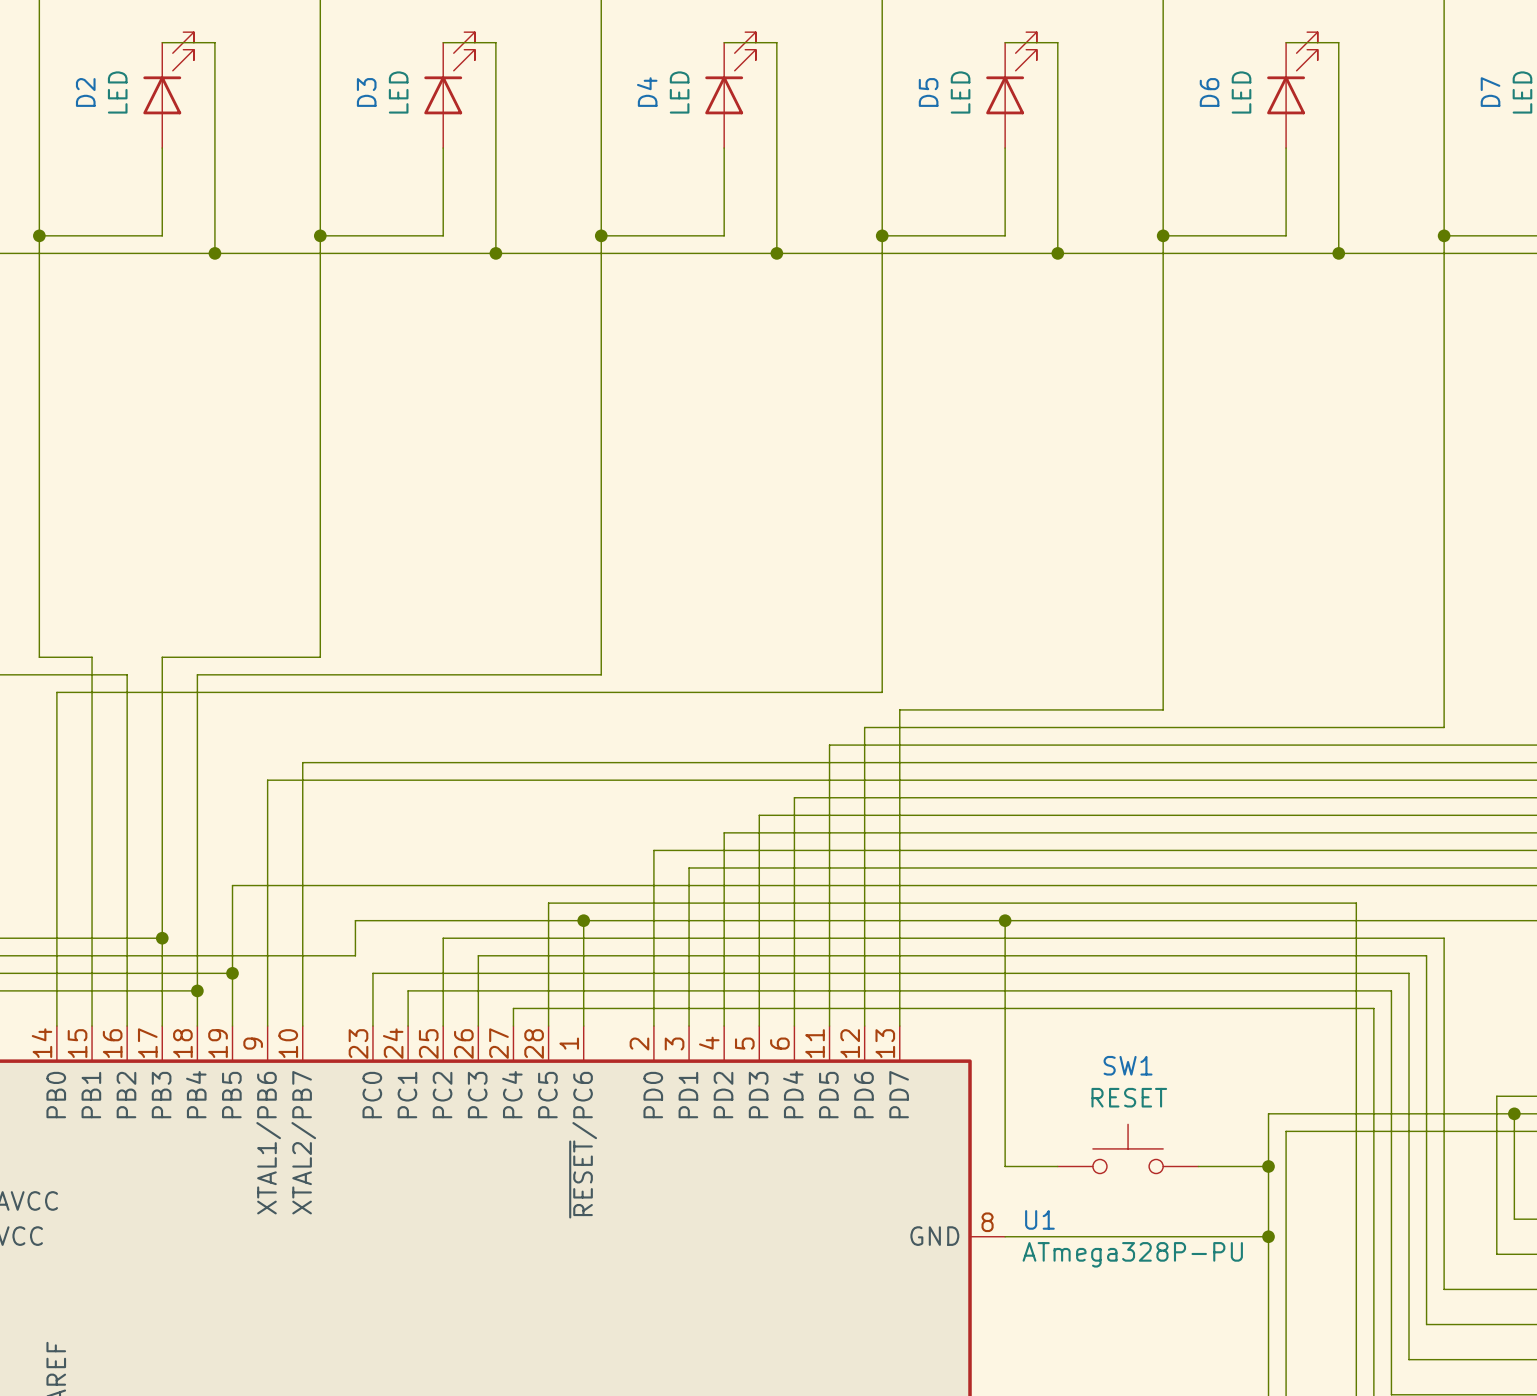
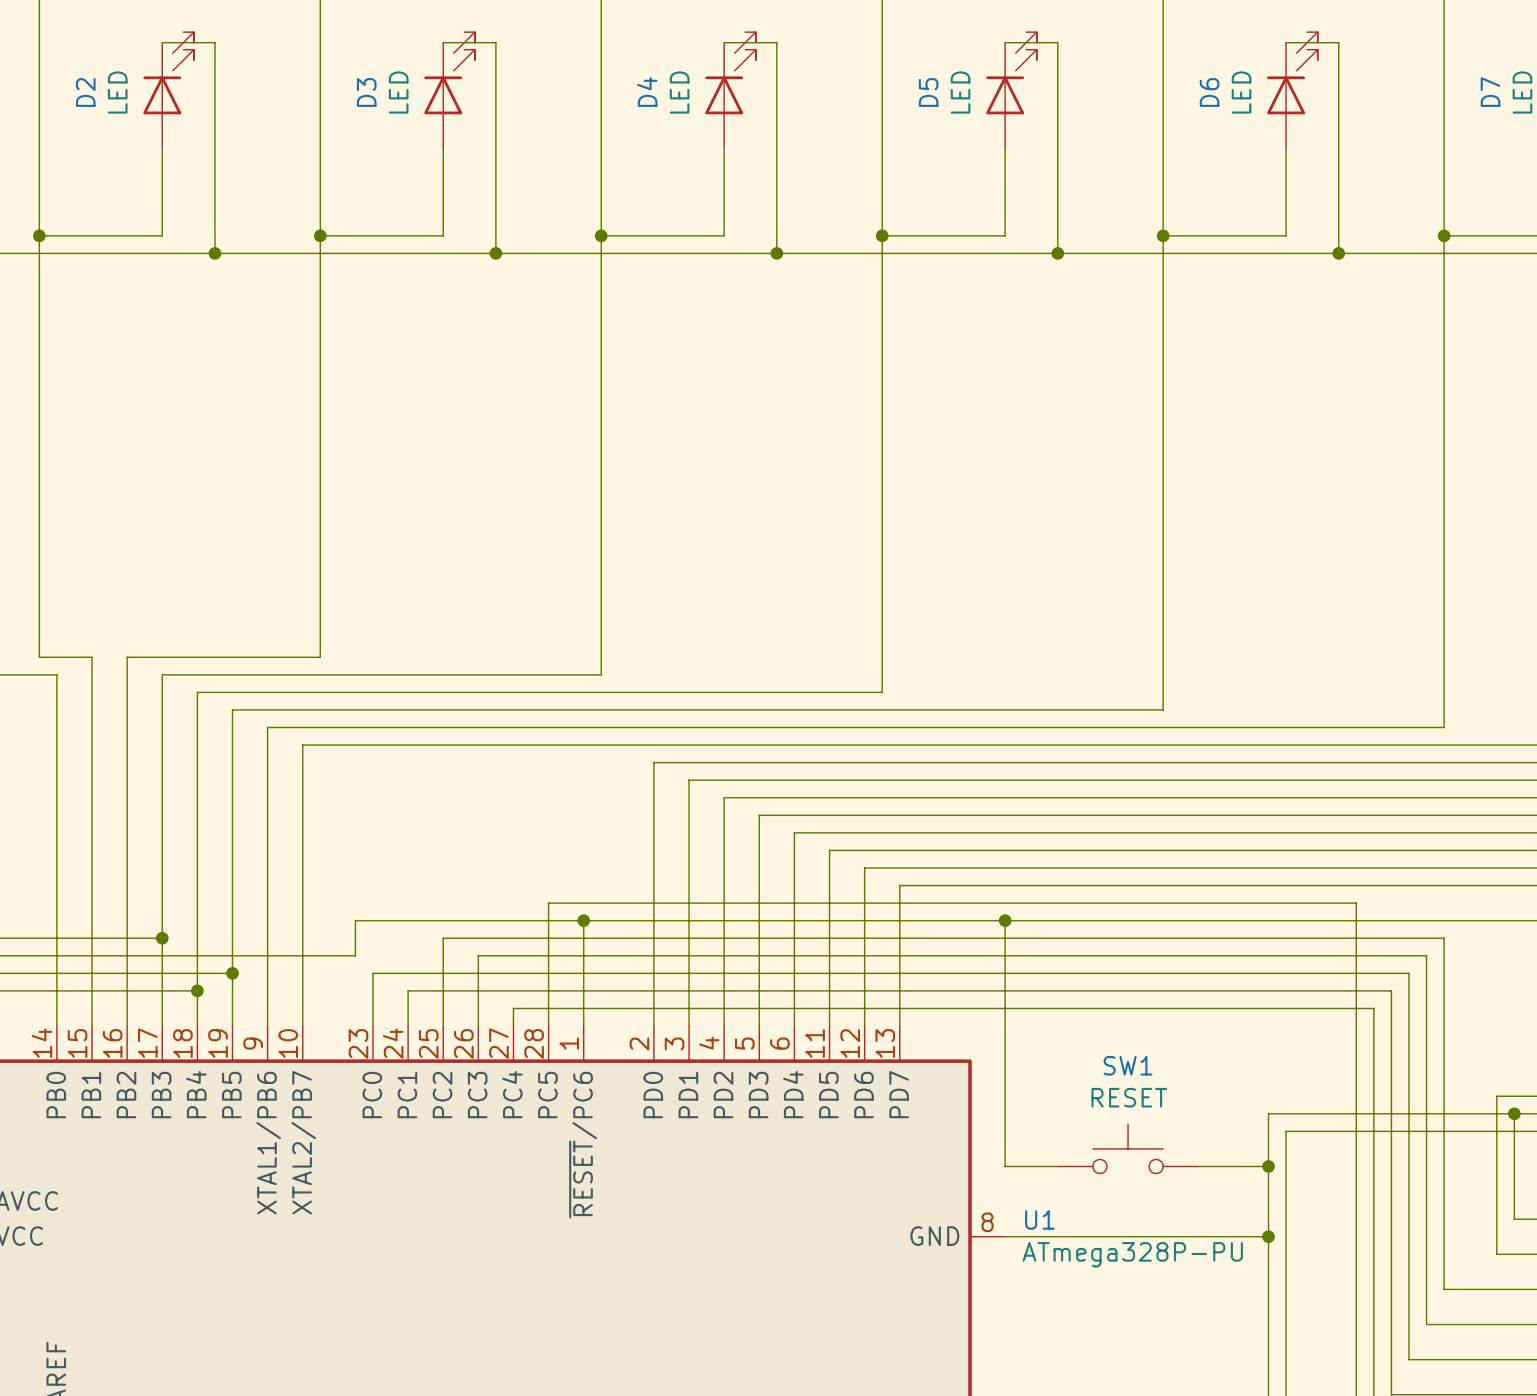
wire: (162, 657) (162, 674) -> (162, 657) (127, 657) (127, 674)
wire: (56, 674) (127, 674) -> (56, 674) (56, 692)
wire: (197, 674) (197, 692) (56, 692) -> (197, 674) (162, 674)
wire: (899, 709) (899, 885) (232, 885) -> (899, 709) (232, 709) (232, 885)
wire: (864, 727) (864, 867) (689, 867) -> (689, 780) (689, 867)
wire: (829, 745) (829, 850) (653, 850) -> (653, 762) (653, 850)
wire: (302, 762) (653, 762) -> (302, 762) (302, 745) (829, 745)
wire: (267, 780) (689, 780) -> (267, 780) (267, 727) (864, 727)
wire: (794, 797) (794, 832) (724, 832) -> (794, 797) (724, 797) (724, 832)

